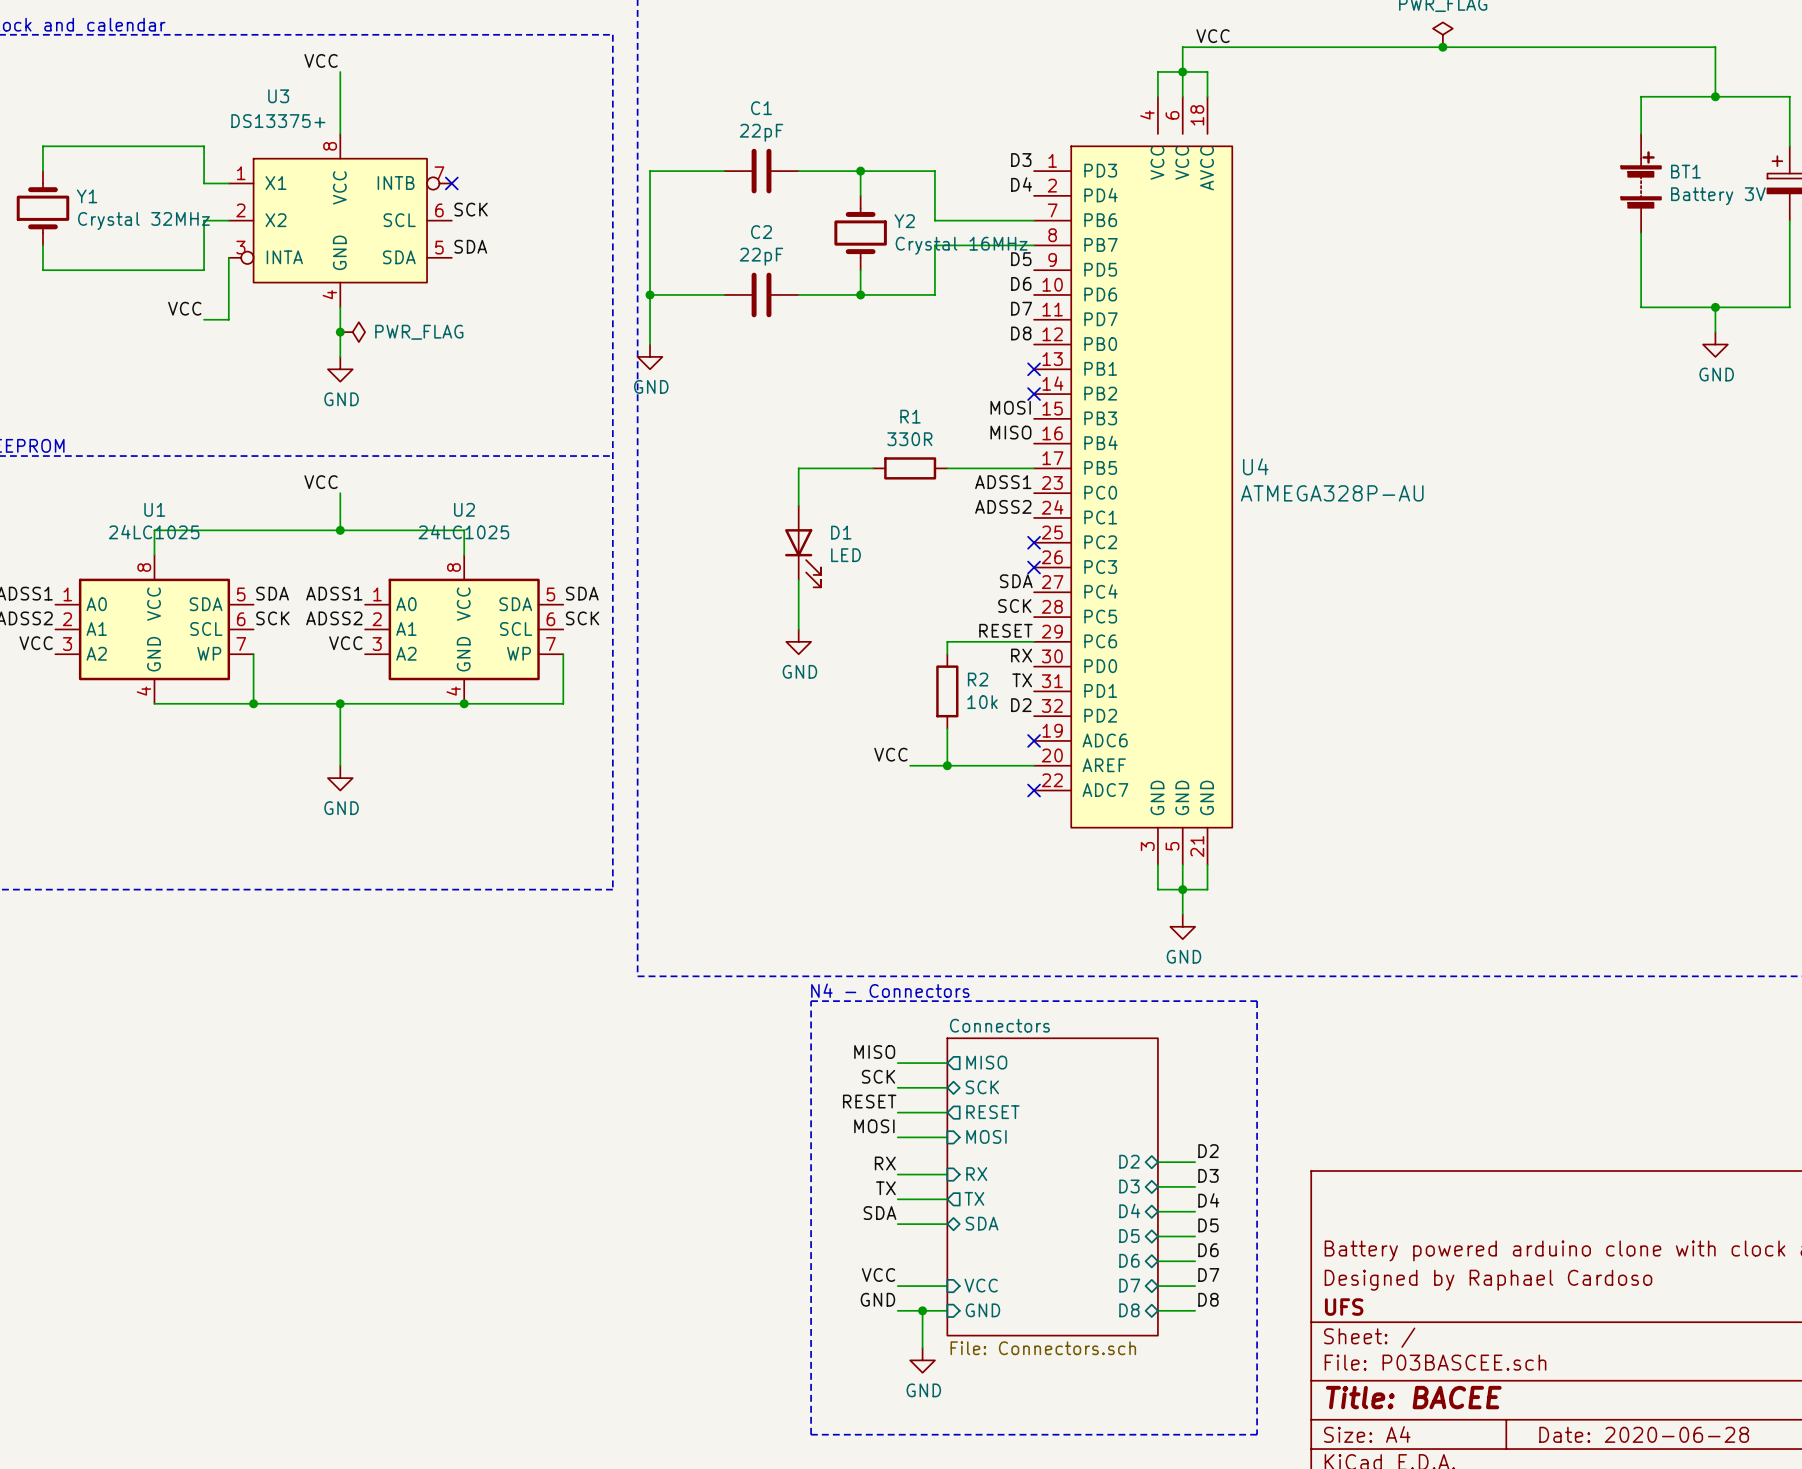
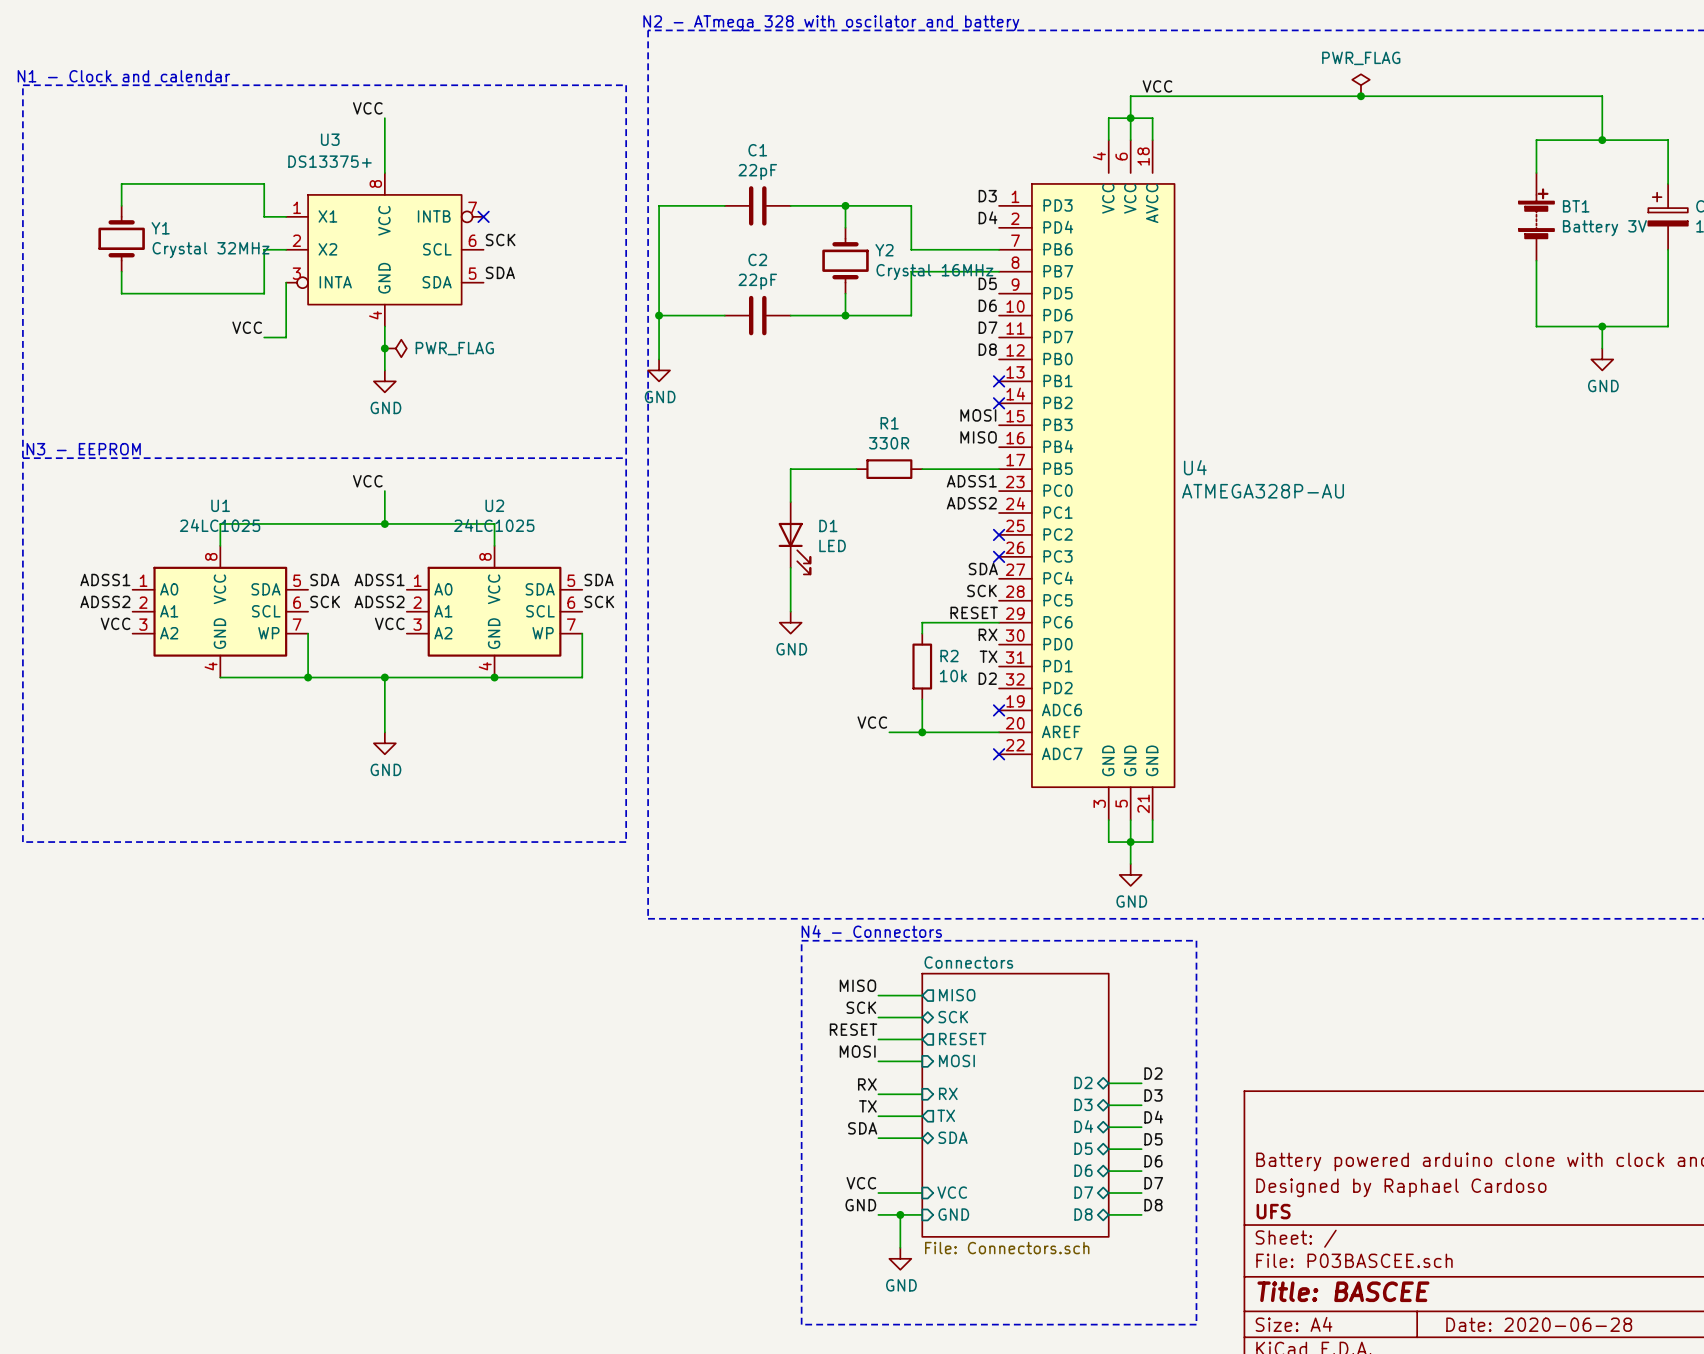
title block: Title: BACEE (1413, 1397) -> Title: BASCEE (1343, 1291)

